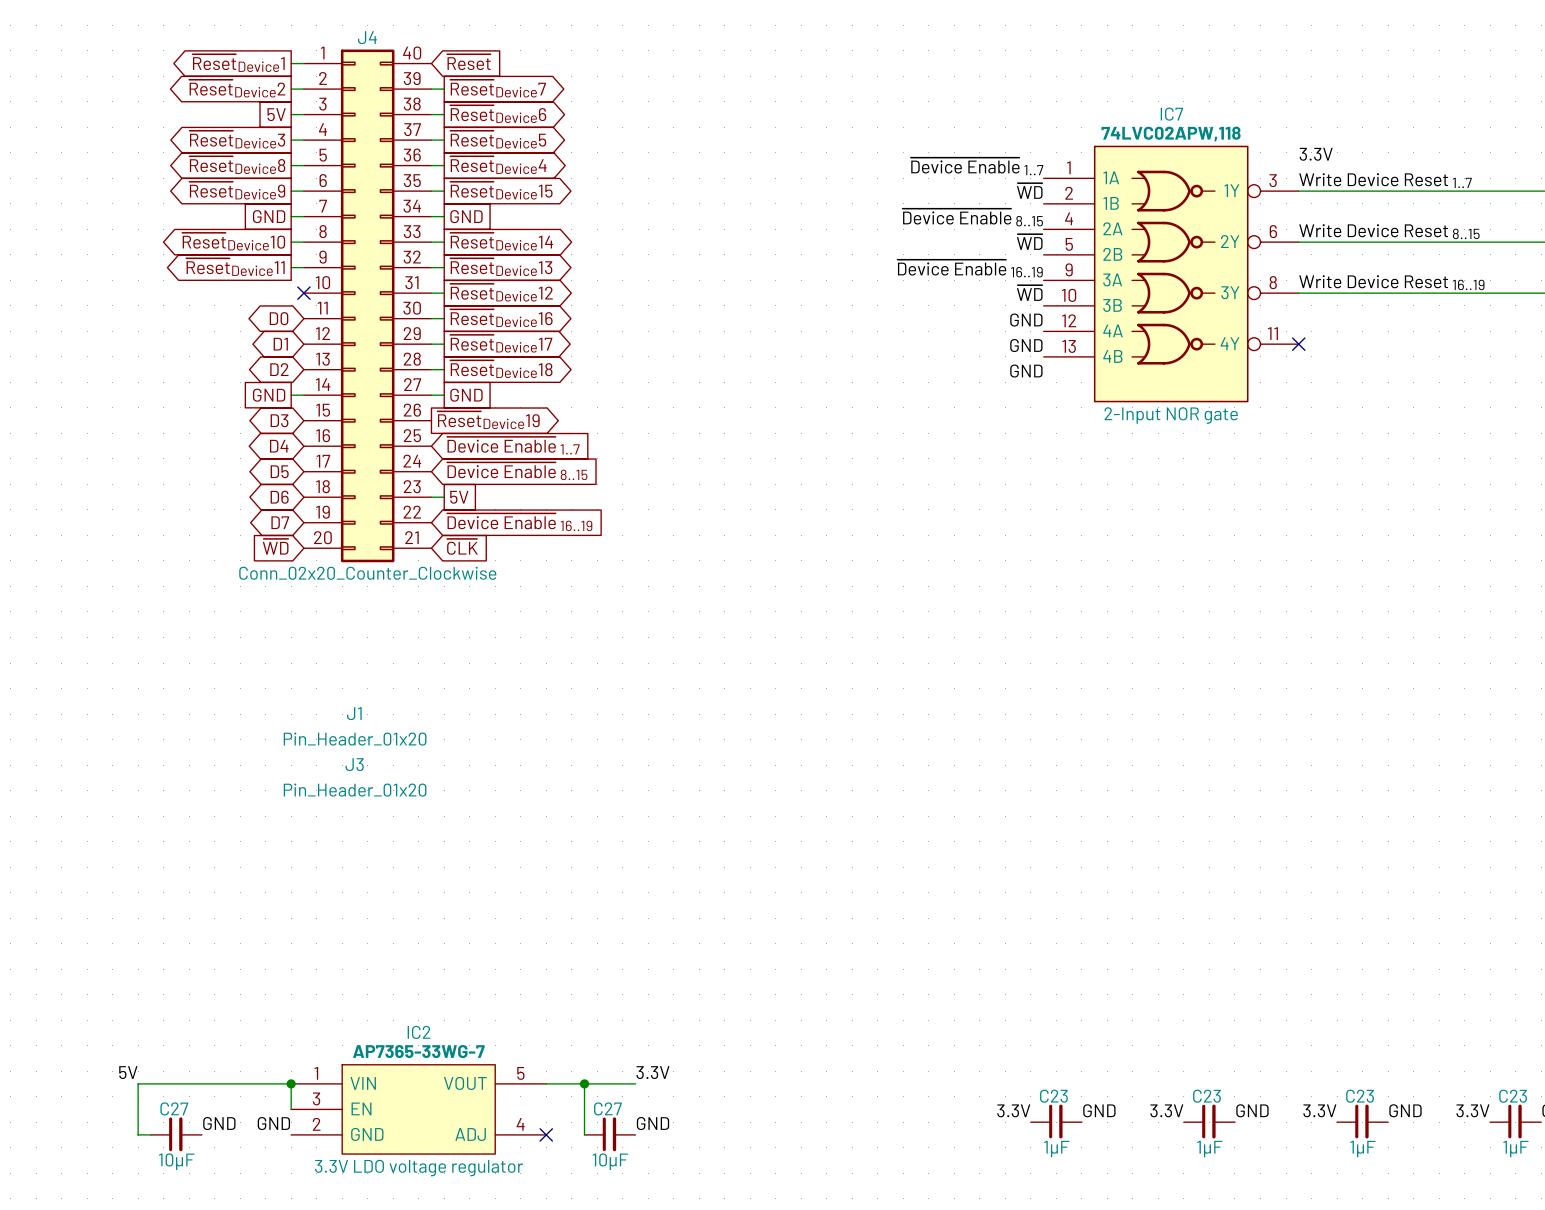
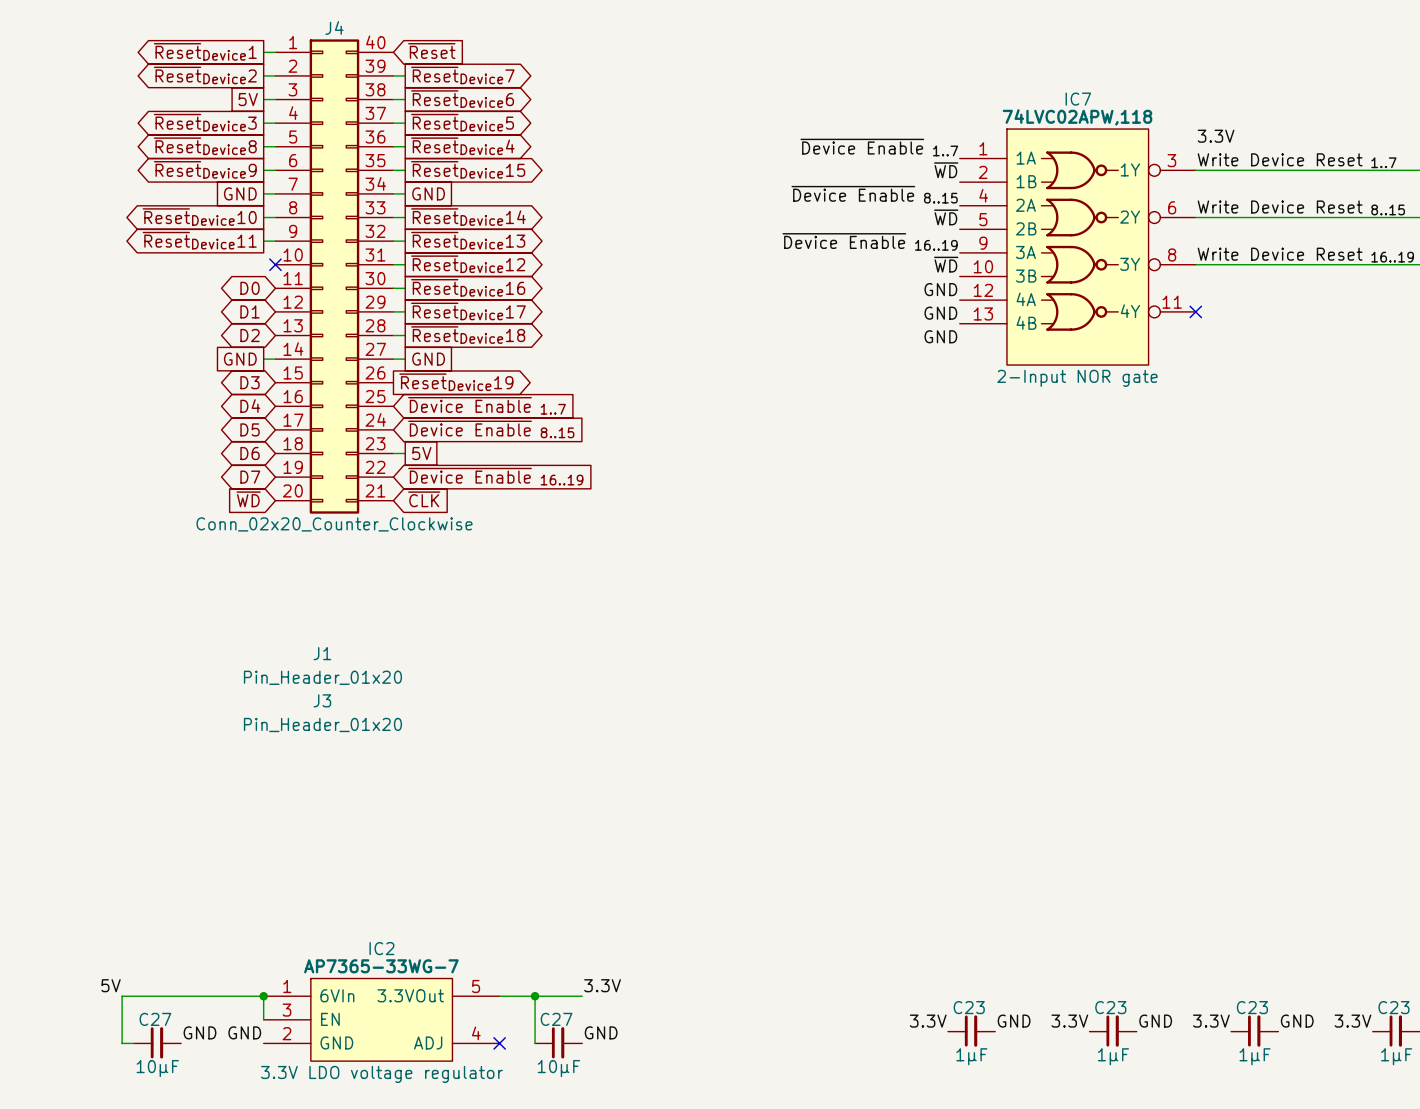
IC2 pin name: VIN (363, 1083) -> 6VIn (337, 995)
IC2 pin name: VOUT (465, 1083) -> 3.3VOut (410, 995)

